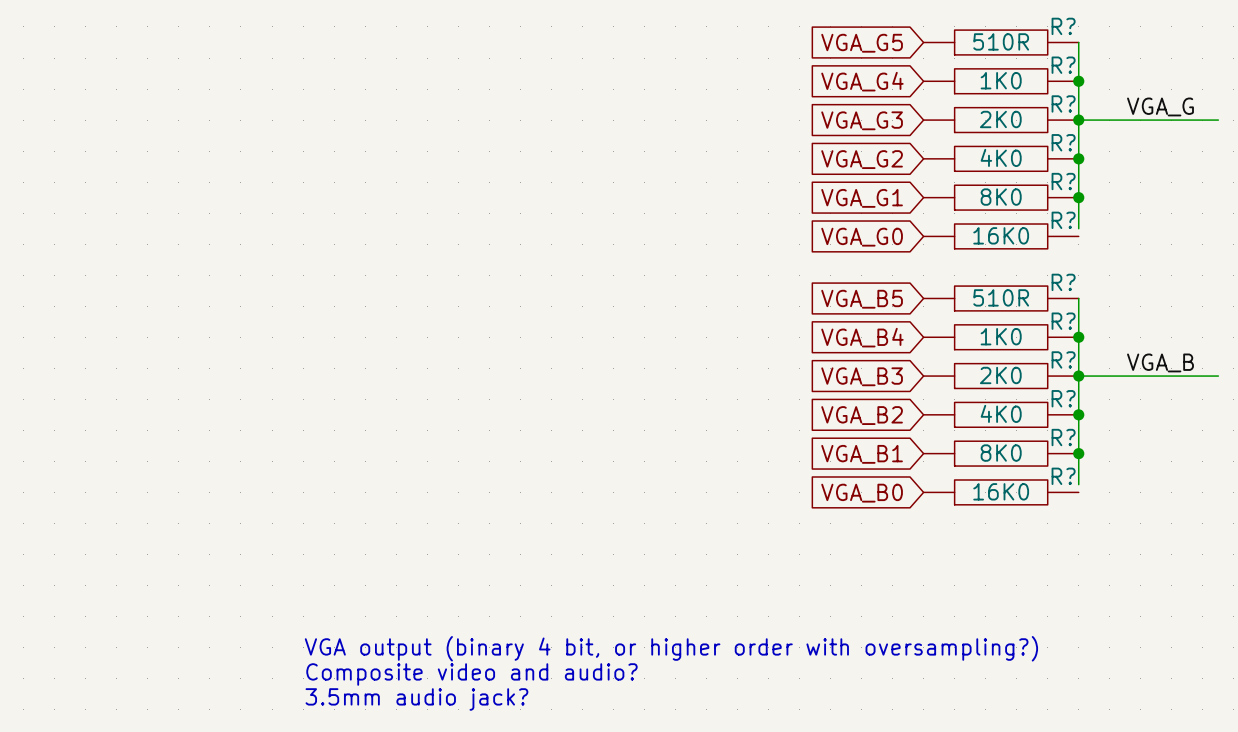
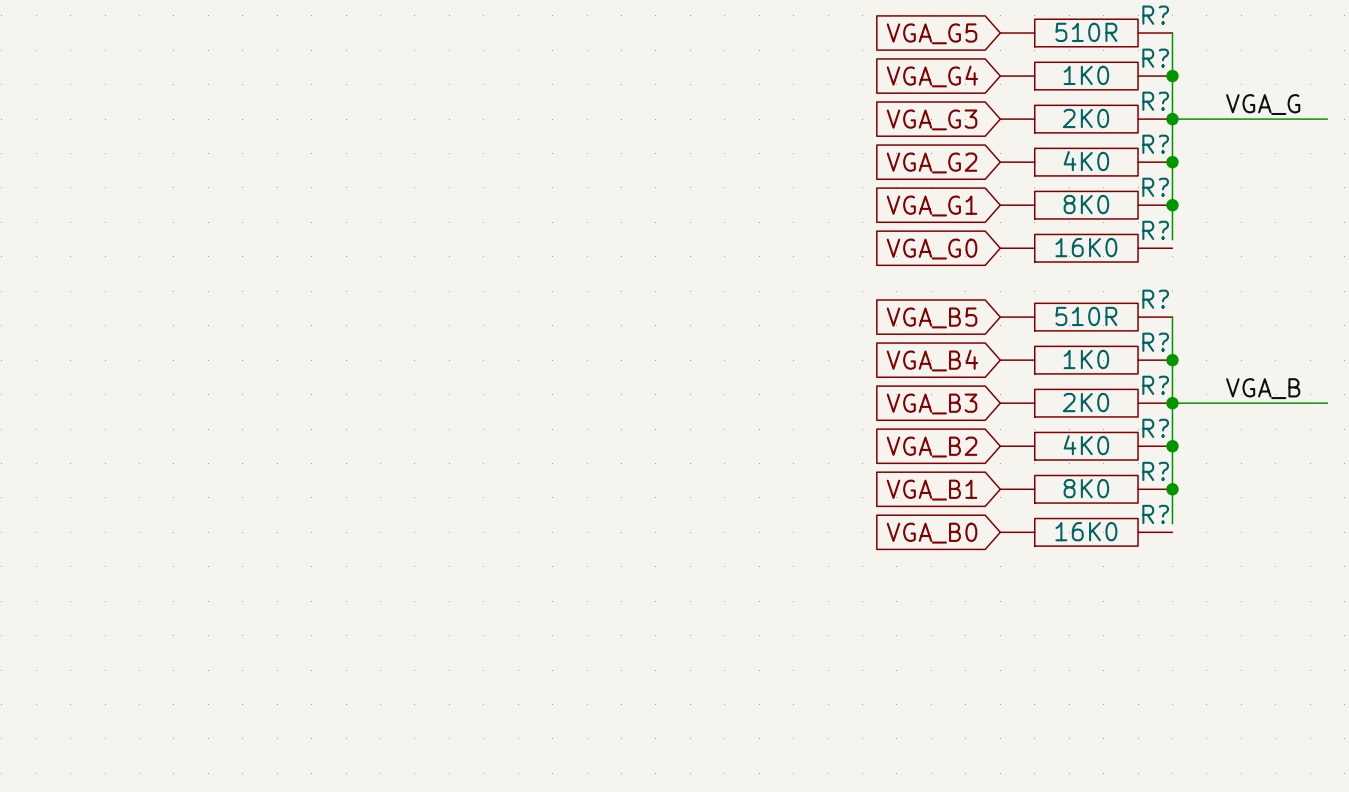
text: VGA output (binary 4 bit, or higher order with oversampling?) (671, 648) -> none
text: Composite video and audio? (471, 674) -> none
text: 3.5mm audio jack? (416, 699) -> none

